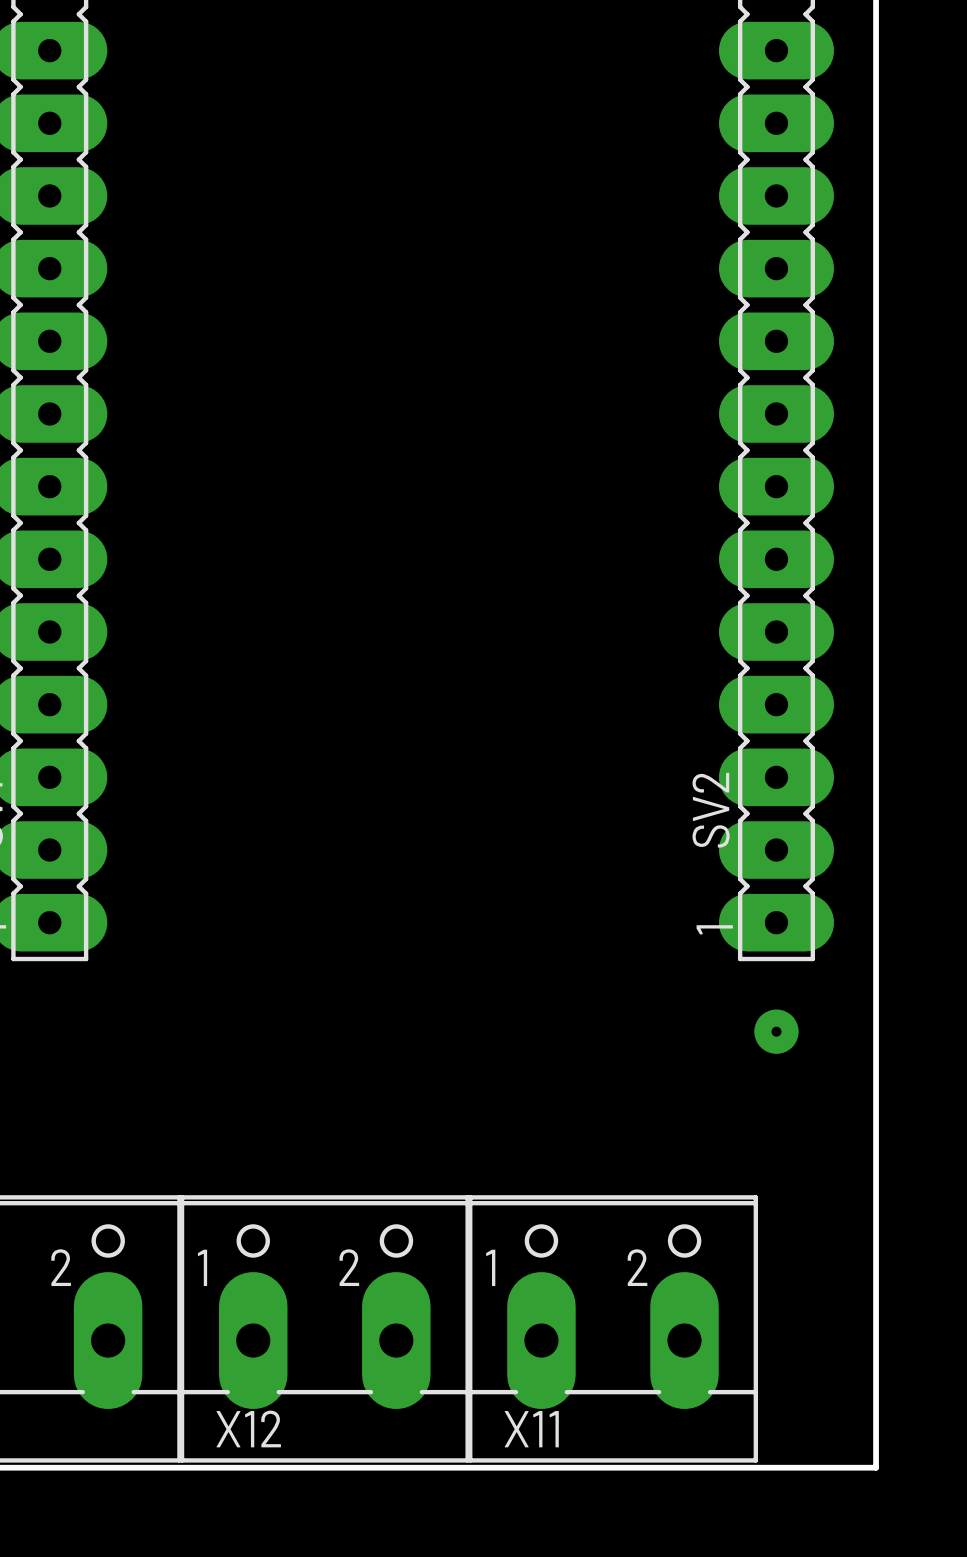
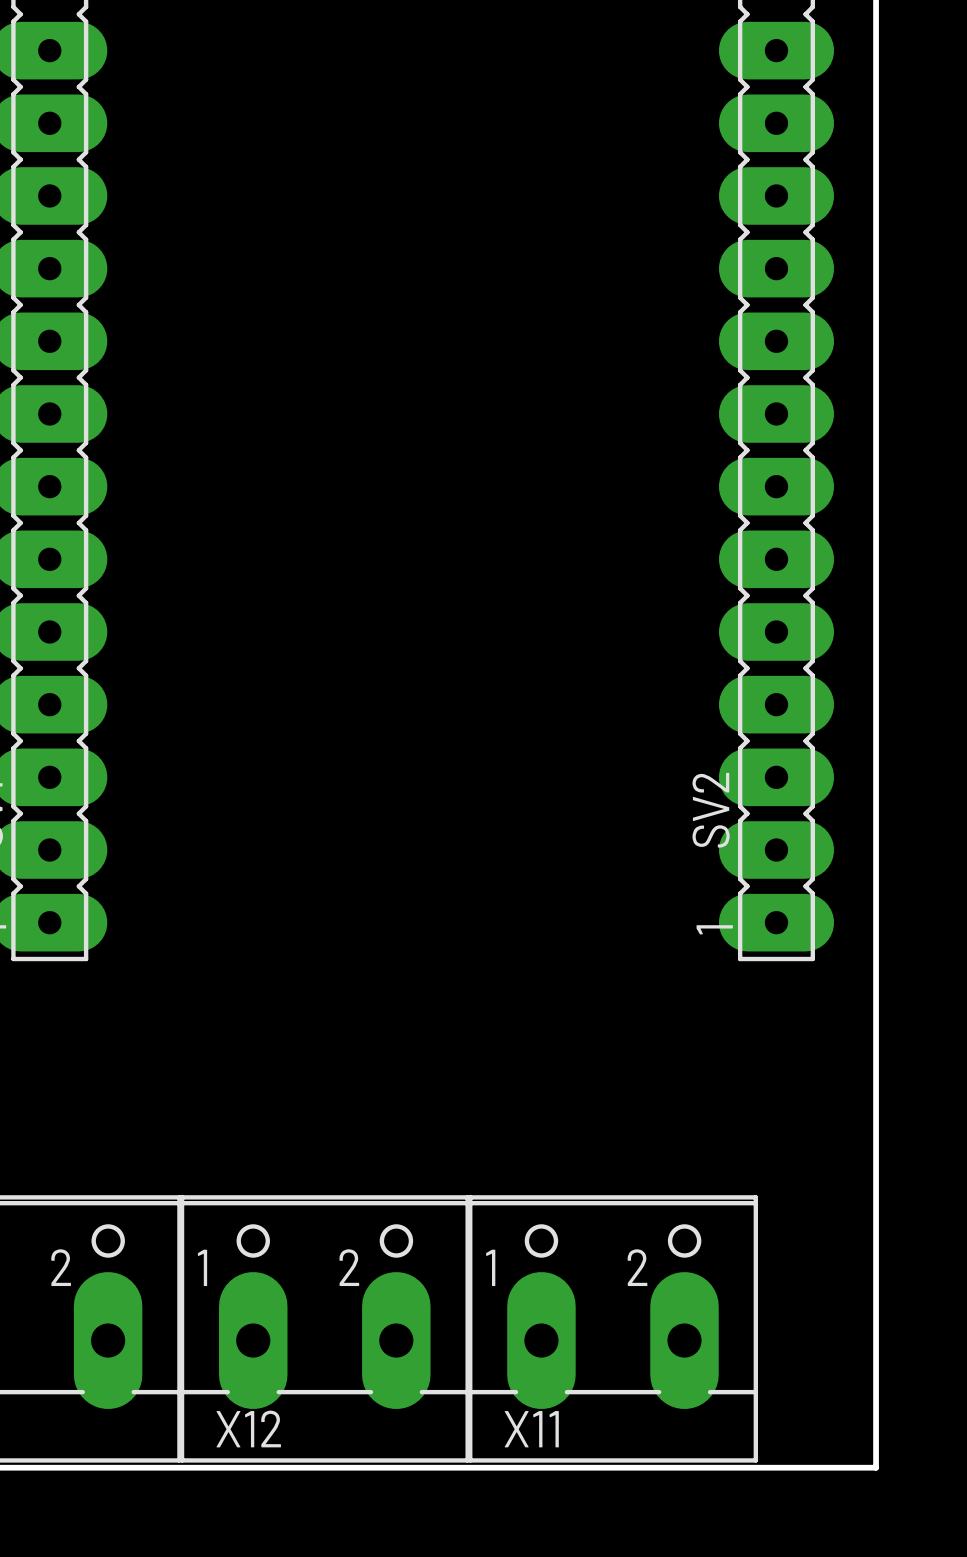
via: (776, 1031) -> none

